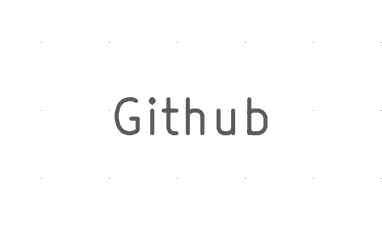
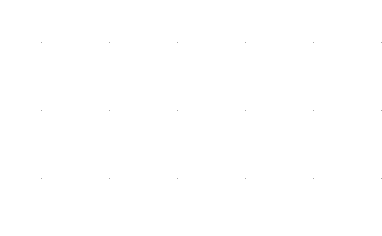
text: Github (191, 116) -> none

